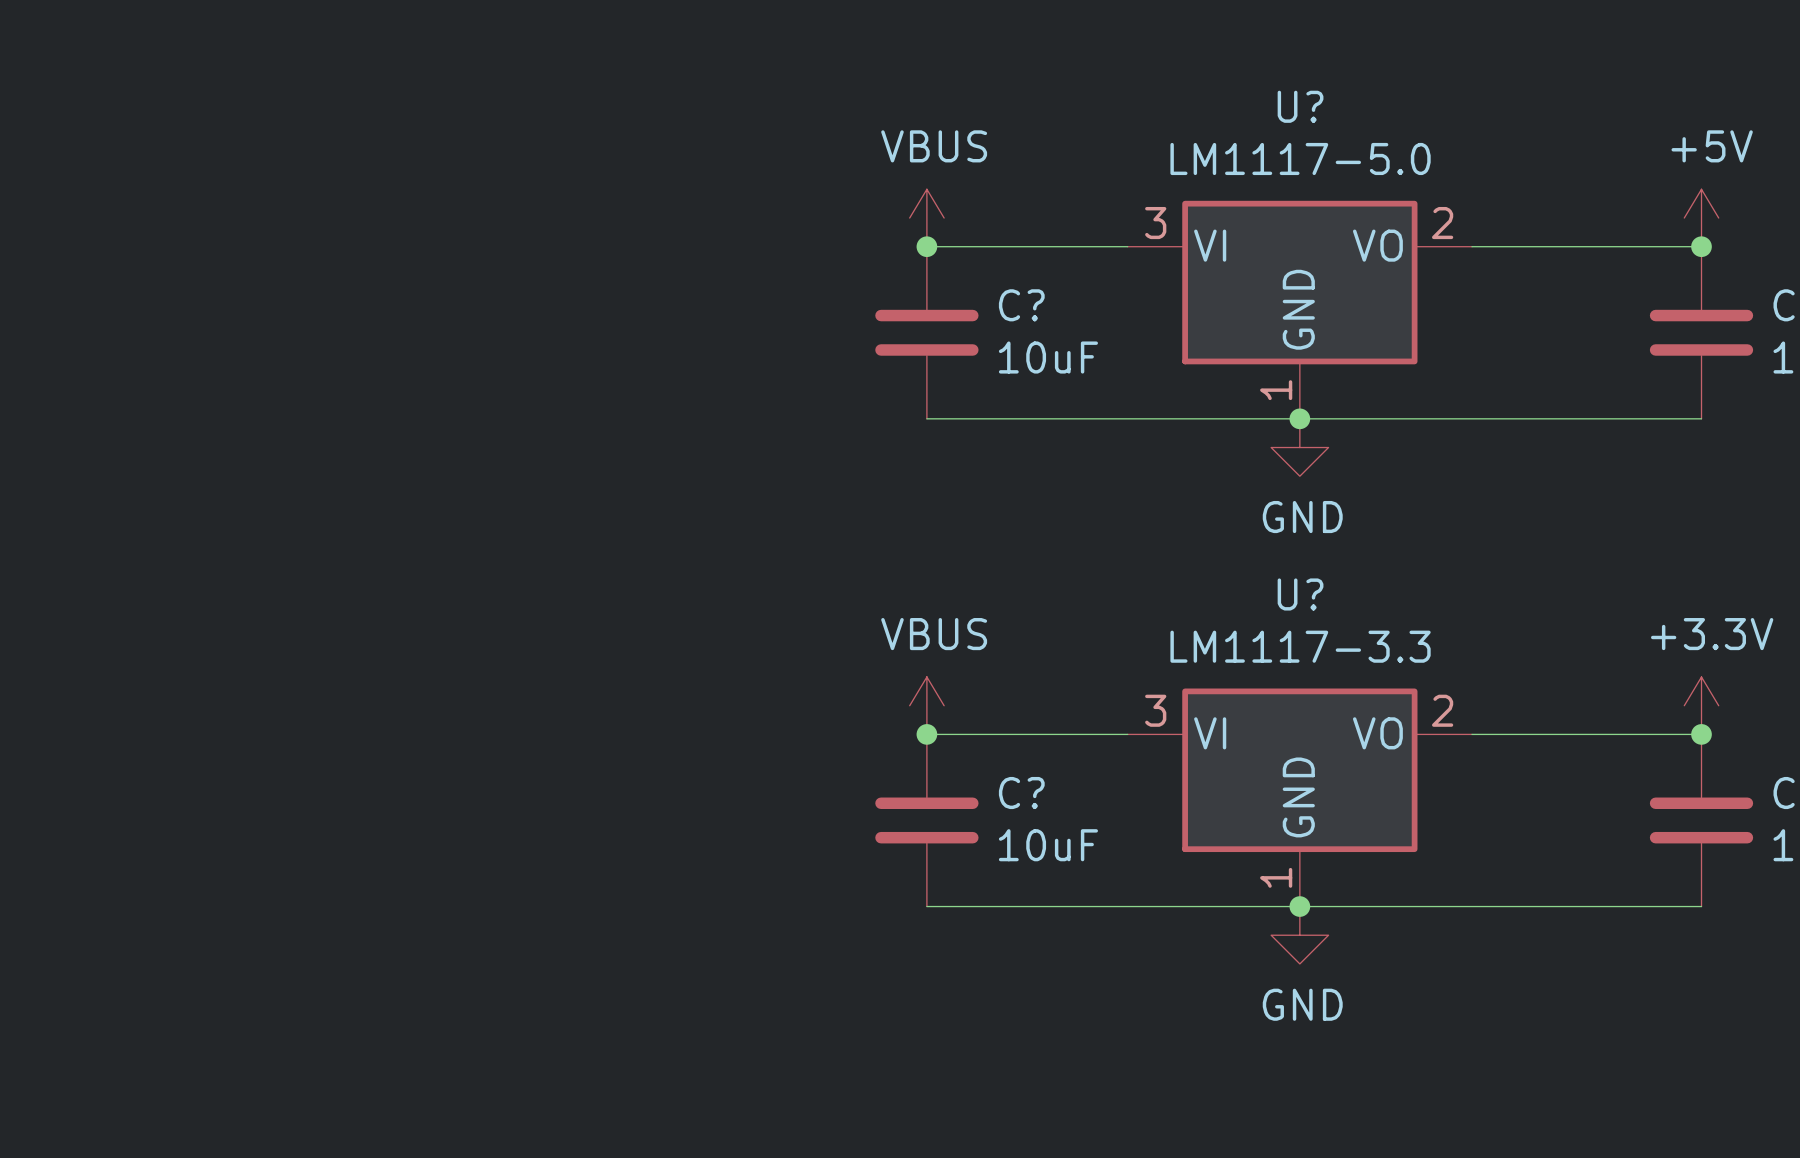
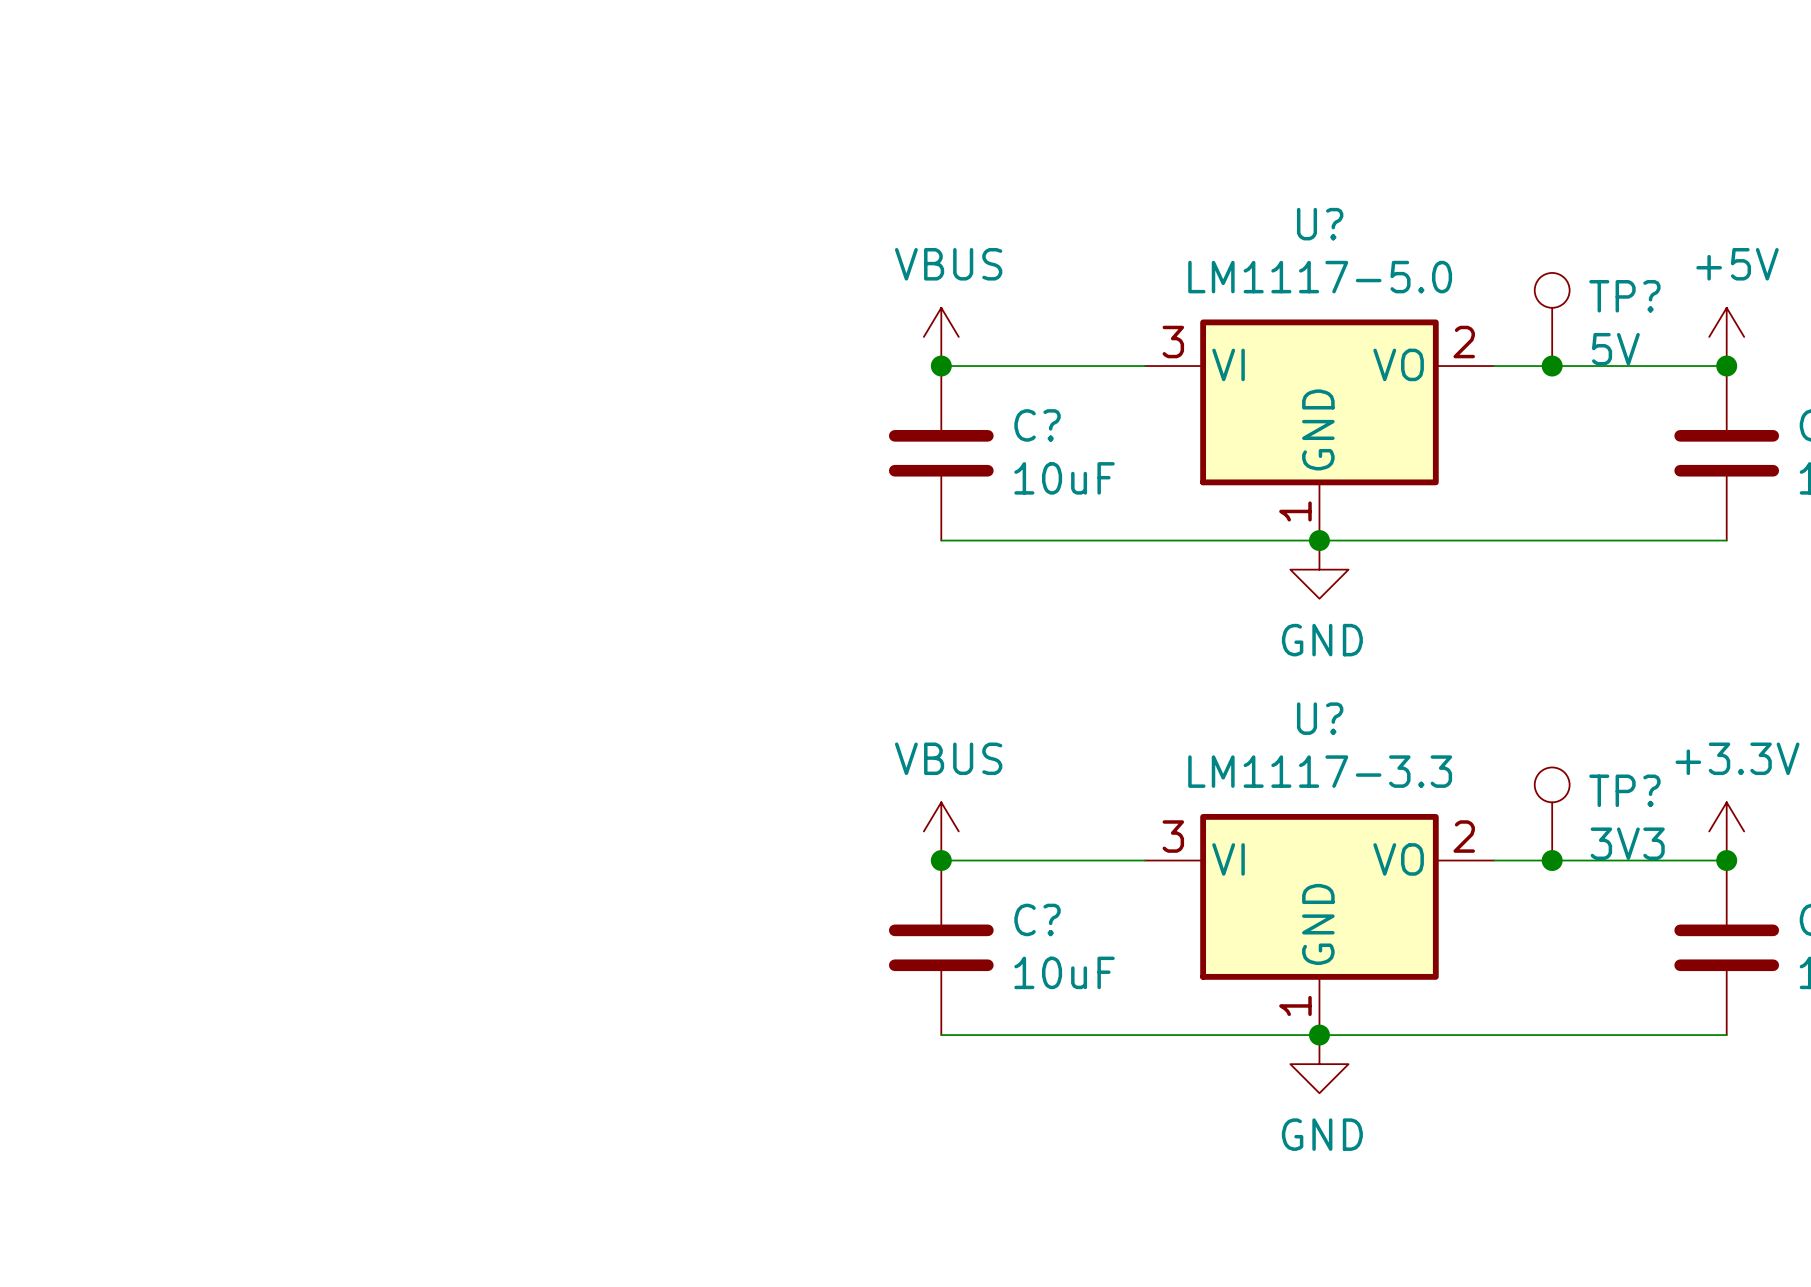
TP?: none -> 5V (1552, 319)
junction: none -> (1552, 366)
TP?: none -> 3V3 (1552, 813)
junction: none -> (1552, 860)

